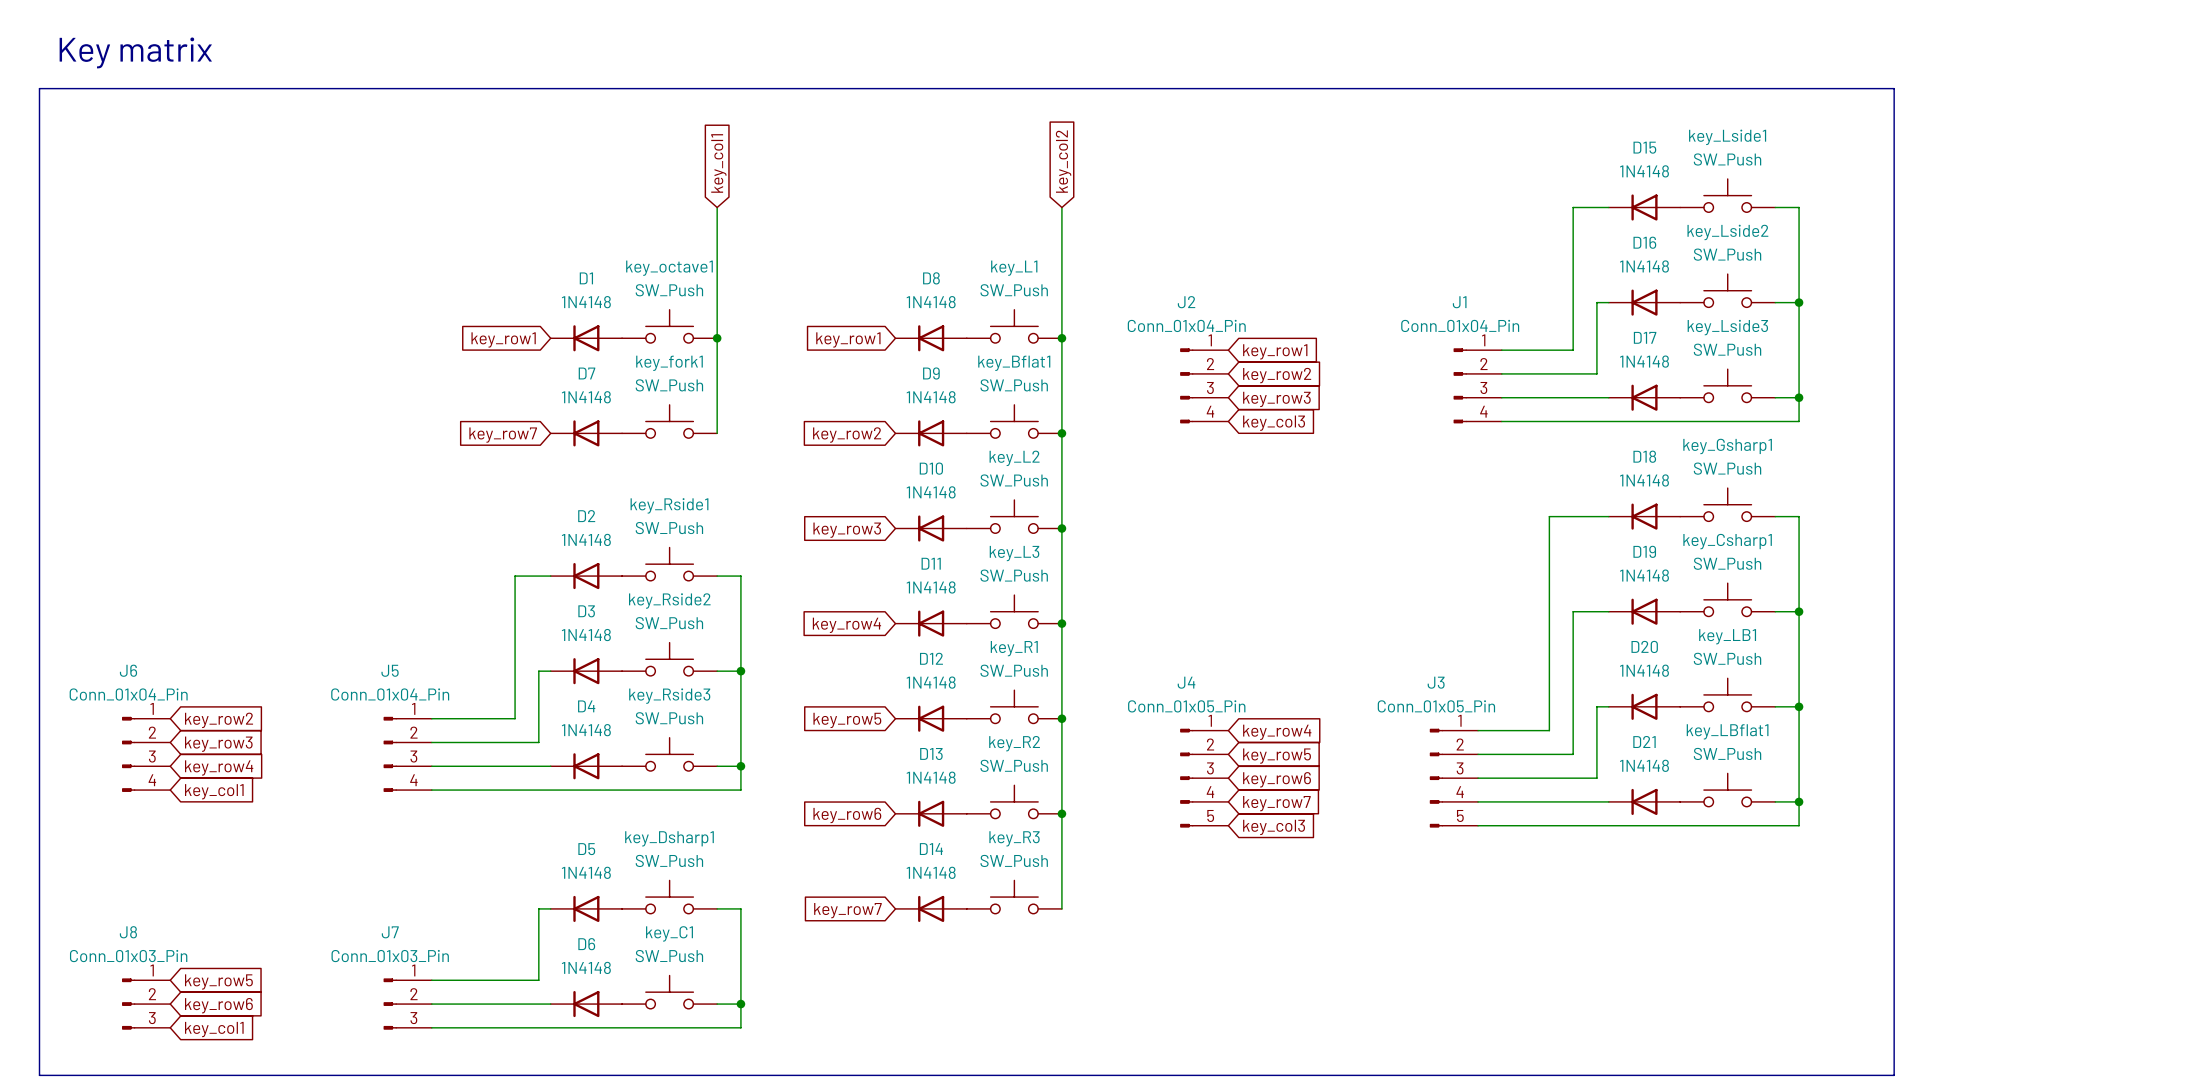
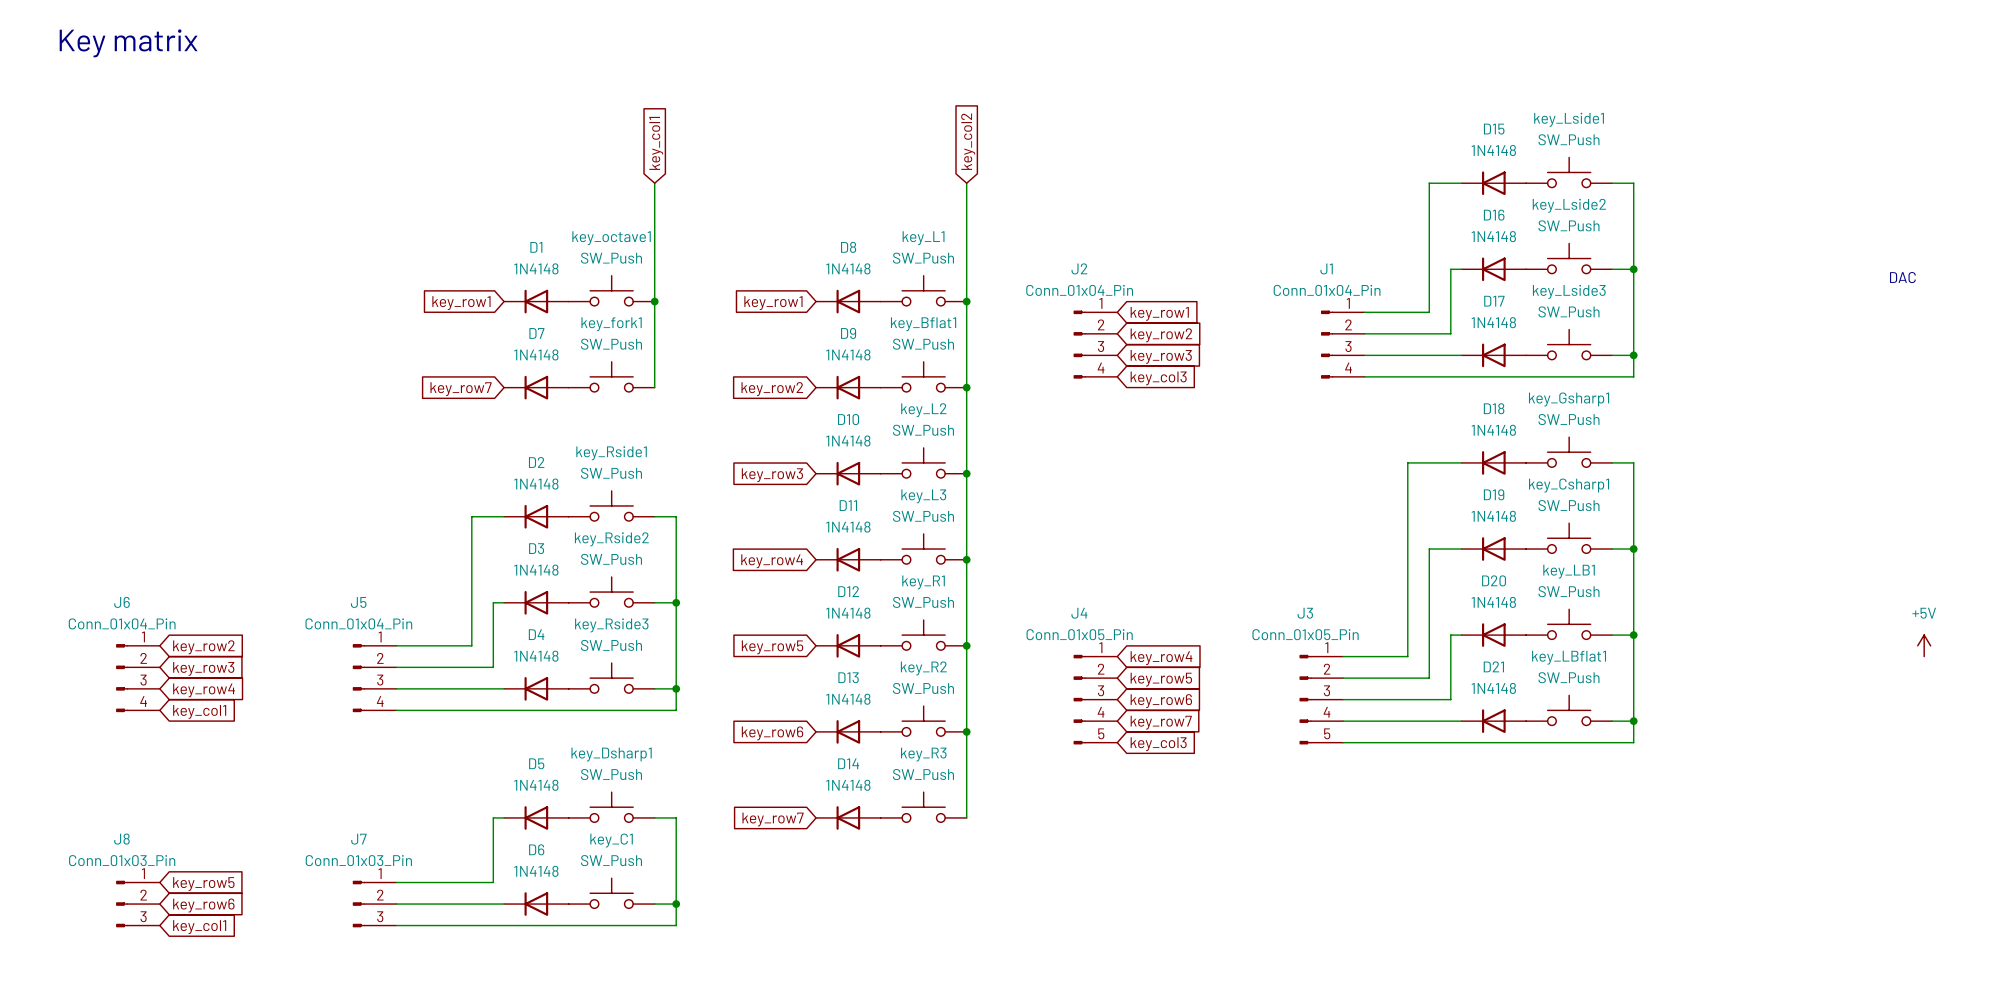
line: (39, 88) (1894, 88) (1894, 1075) (39, 1075) (39, 88) -> none
text: none -> DAC (1902, 277)
power symbol: none -> +5V (1924, 645)

